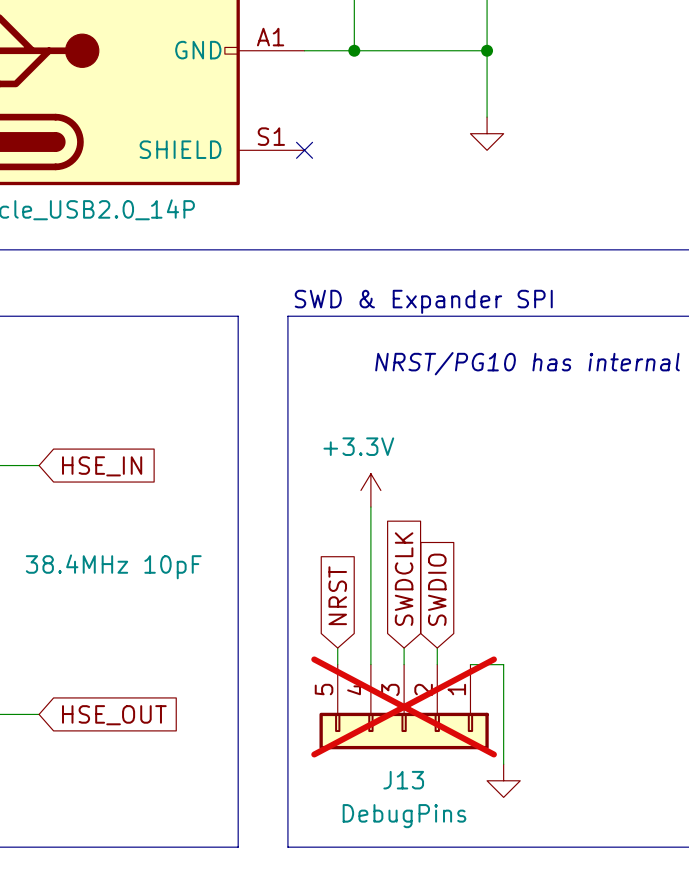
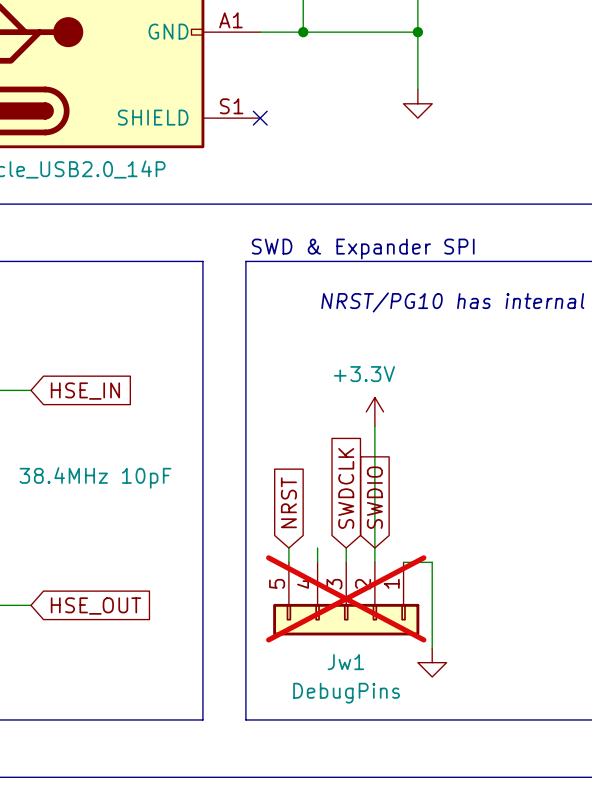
power symbol position: +3.3V (370, 490) -> +3.3V (374, 411)
wire: (370, 507) (370, 648) -> (374, 426) (374, 548)
J13 name: J13 (403, 780) -> Jw1 (345, 662)

